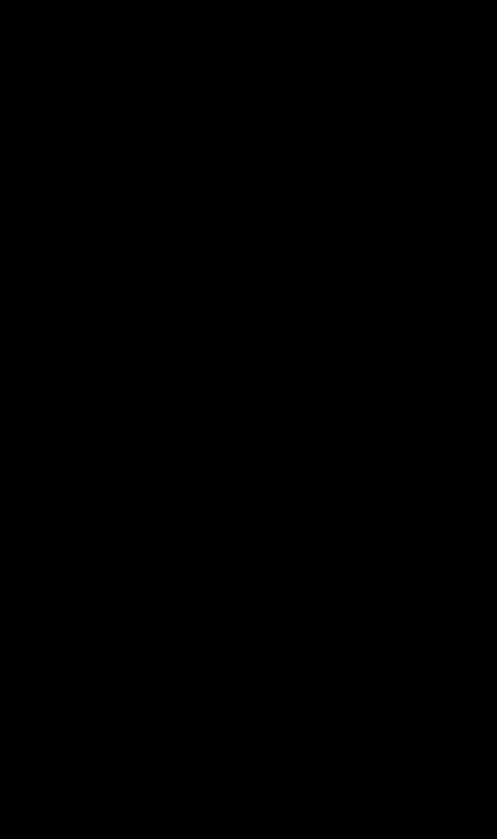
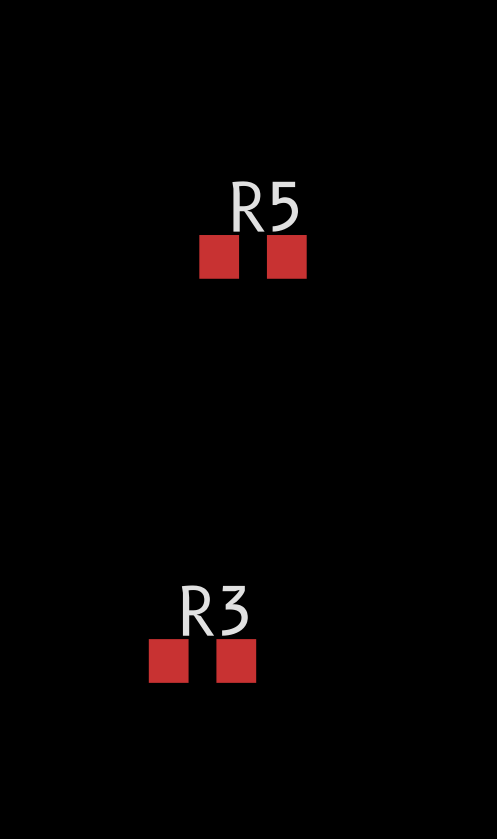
R5: none -> (253, 256)
R3: none -> (202, 660)

